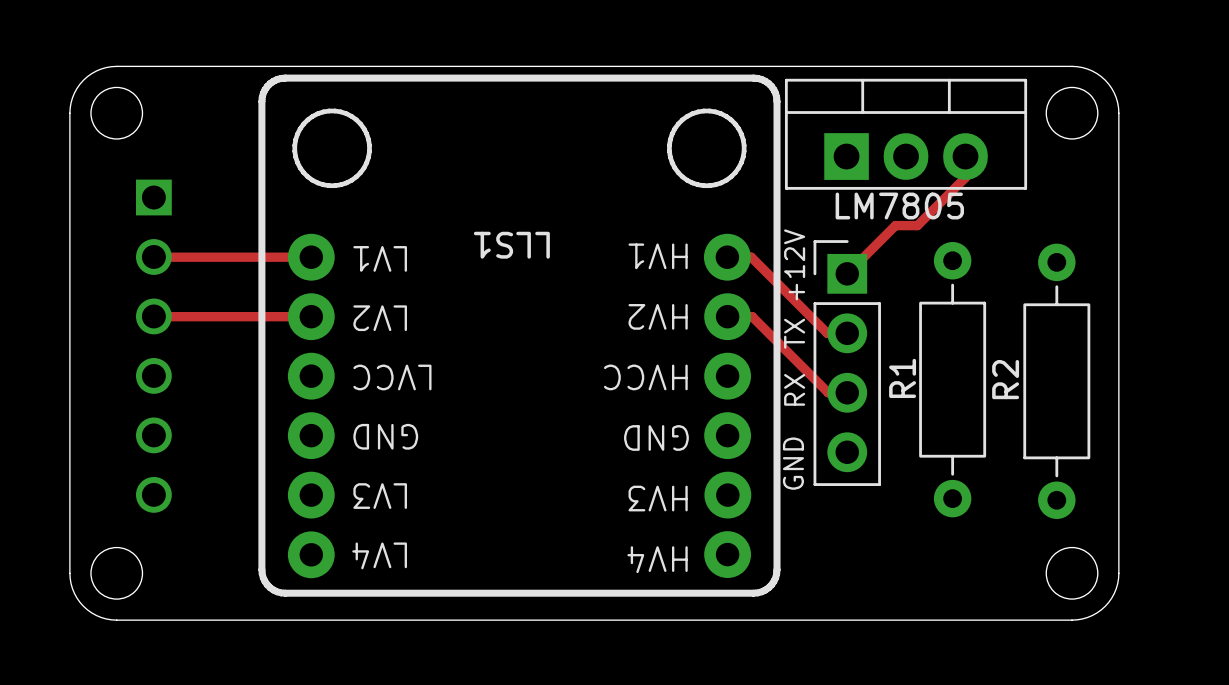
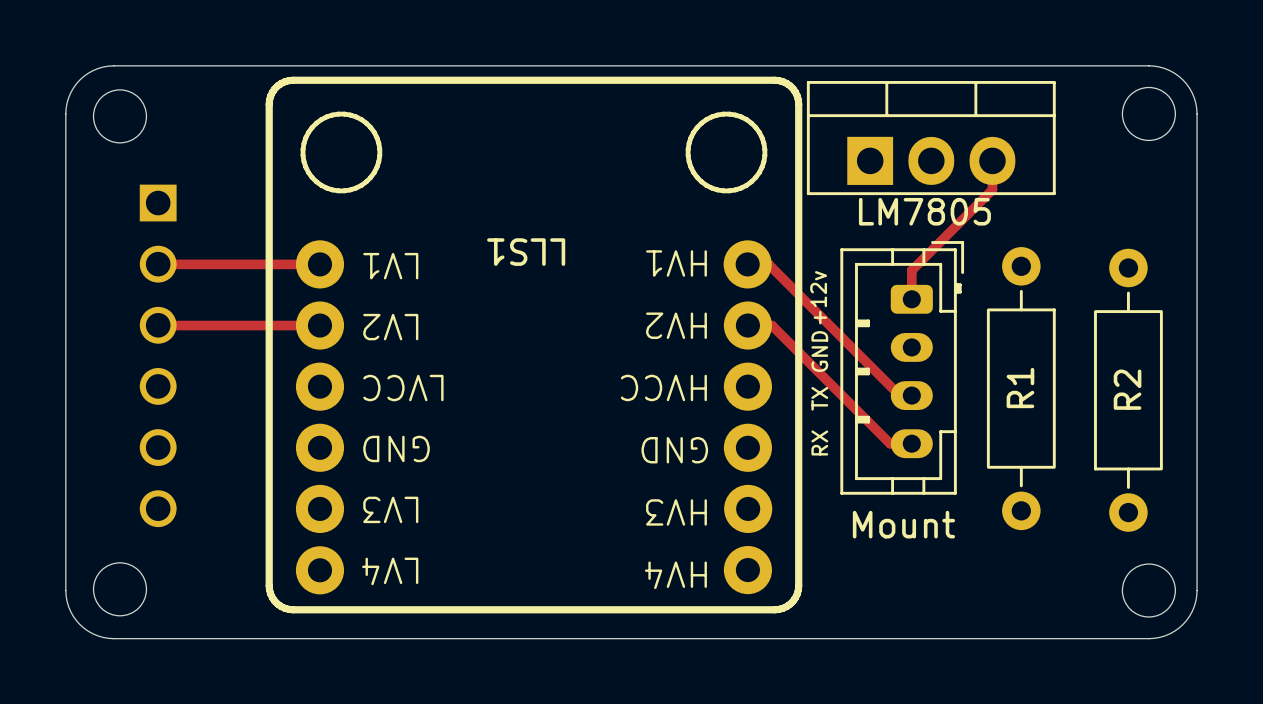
board edge: (116, 66) (1072, 66) (1092, 71) (1101, 76) (1111, 88) (1116, 97) (1118, 113) (1118, 573) (1114, 593) (1108, 602) (1096, 612) (1087, 617) (1072, 620) (116, 620) (96, 615) (87, 609) (77, 598) (71, 583) (69, 573) (69, 113) (72, 97) (83, 80) (96, 71) (116, 66) -> (113, 65) (93, 70) (79, 79) (68, 98) (65, 113) (65, 590) (67, 601) (73, 616) (83, 628) (93, 633) (113, 638) (1148, 638) (1164, 635) (1174, 631) (1182, 624) (1192, 611) (1197, 590) (1197, 113) (1195, 103) (1189, 88) (1182, 79) (1169, 70) (1148, 65) (113, 65)
round board edge position: (1072, 113) -> (1148, 113)
track: (965, 177) (917, 225) (895, 225) (847, 273) -> (992, 182) (992, 189) (911, 270) (911, 299)
track: (747, 257) (751, 257) (827, 333) (847, 333) -> (768, 264) (899, 395) (911, 395) (911, 385)
track: (751, 316) (828, 392) (847, 392) -> (771, 325) (890, 443) (911, 443)
Mount: none -> (902, 367)
part: (847, 363) -> none
R1 name position: R1 (902, 378) -> R1 (1020, 388)
R1 position: (952, 379) -> (1021, 388)
R2 name position: R2 (1005, 379) -> R2 (1127, 389)
R2 position: (1056, 381) -> (1128, 390)
round board edge position: (1072, 573) -> (1148, 590)

